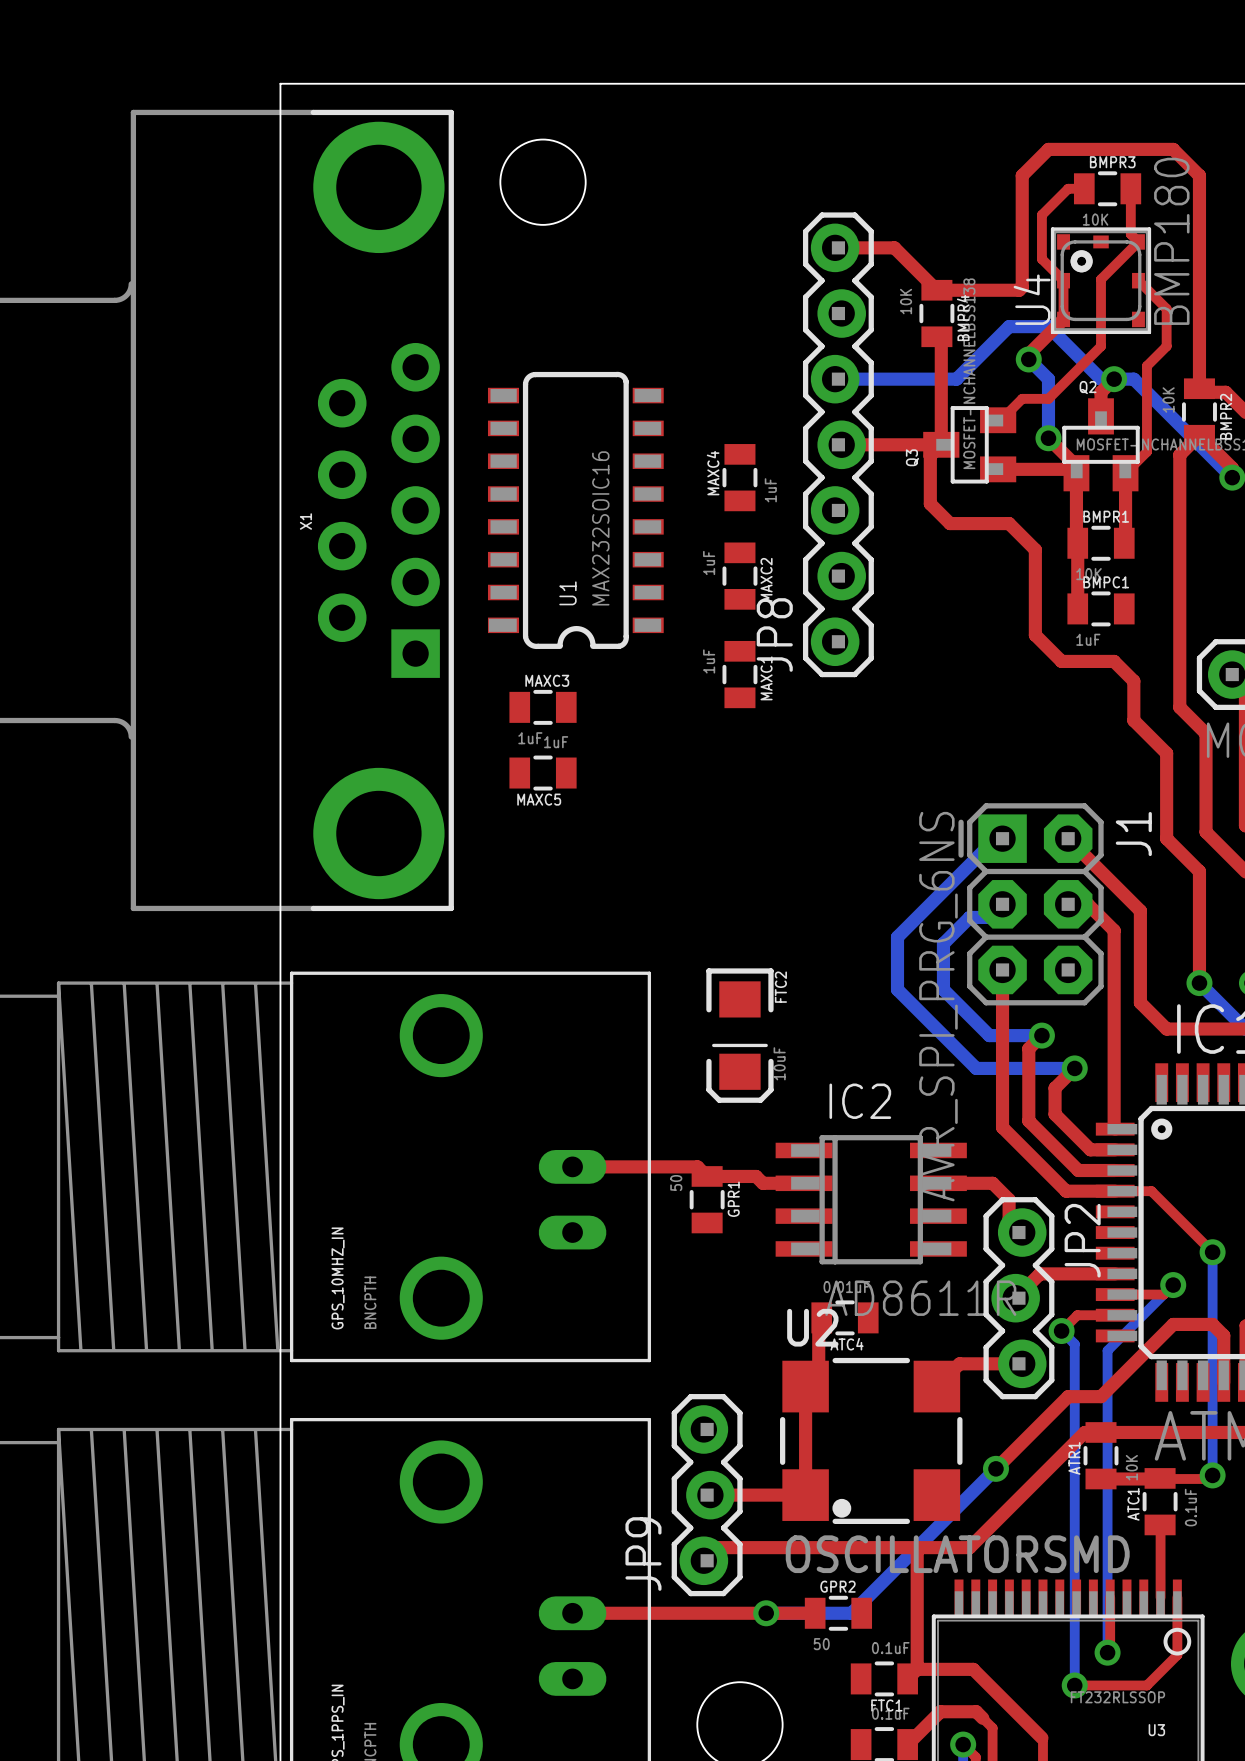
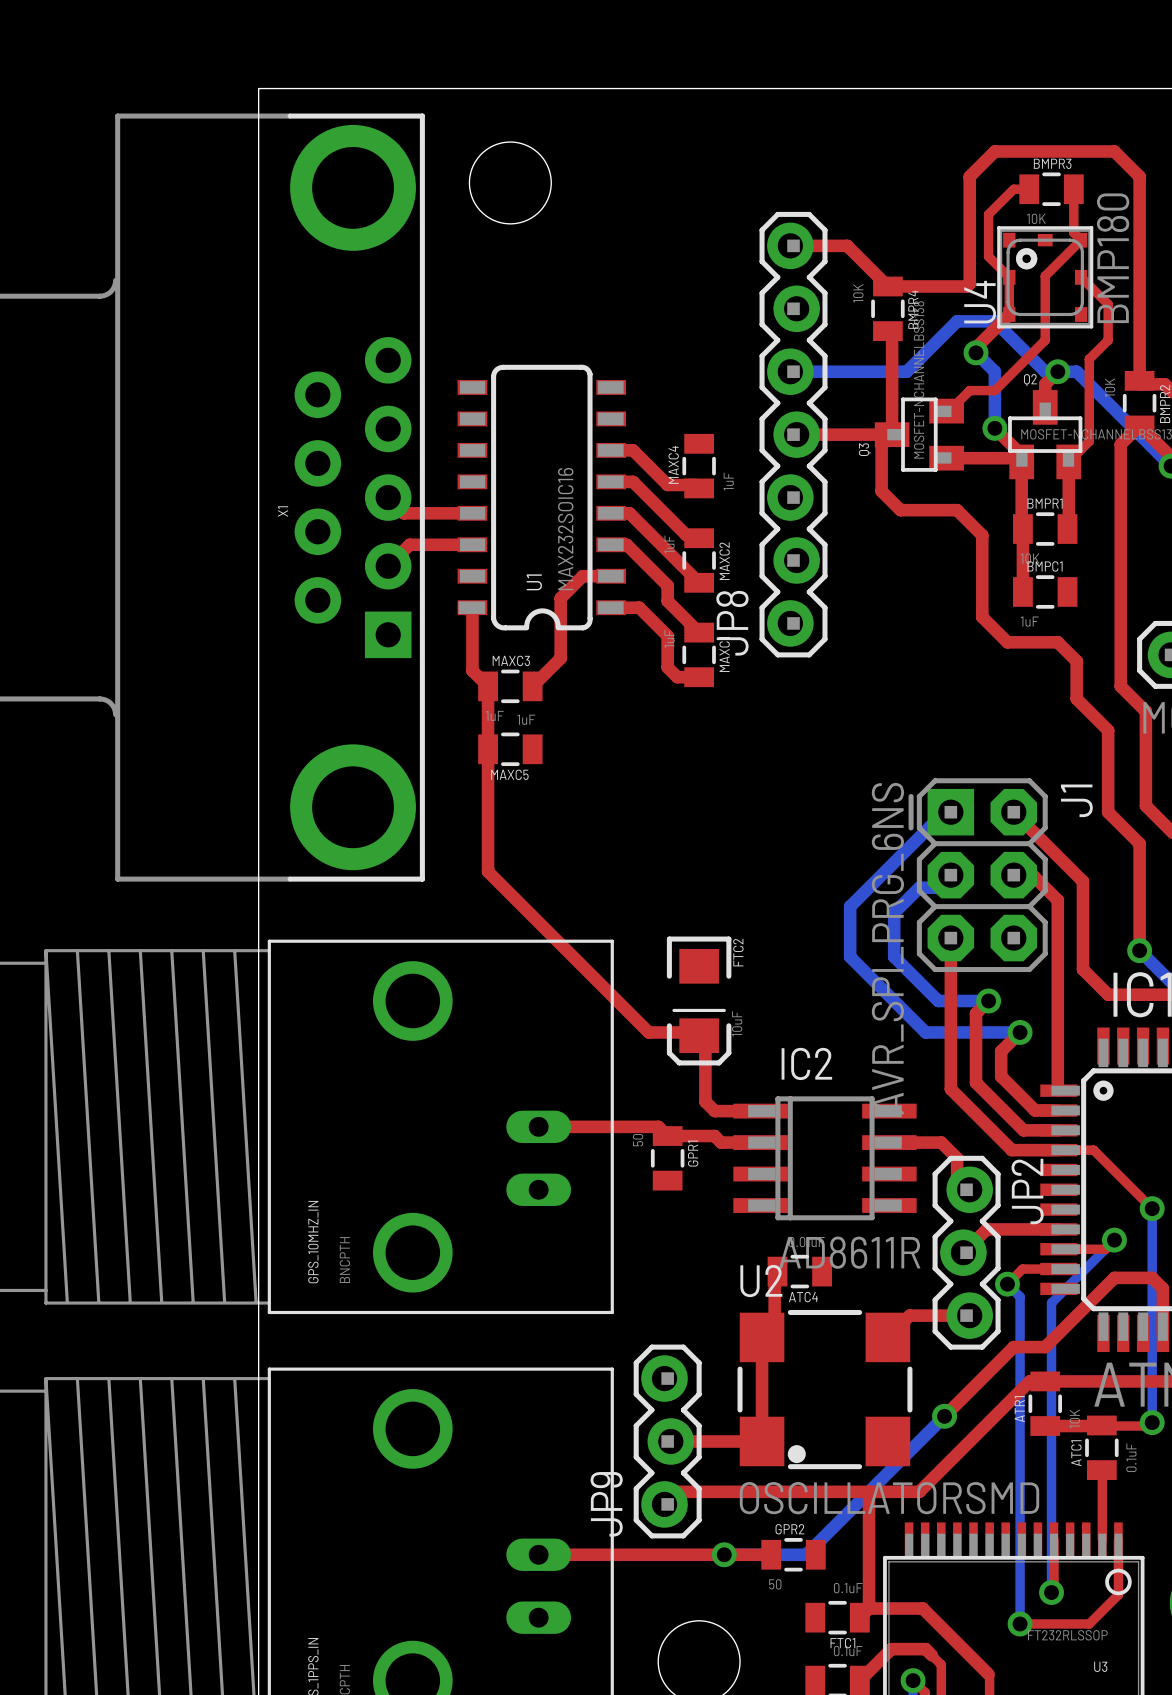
top track: none -> (611, 450) (633, 450) (667, 484) (695, 484) (699, 488)
top track: none -> (611, 481) (633, 481) (686, 535) (696, 535) (699, 538)
top track: none -> (388, 497) (403, 513) (472, 513)
top track: none -> (611, 513) (629, 513) (699, 582)
top track: none -> (472, 544) (409, 544) (388, 566)
top track: none -> (611, 544) (626, 544) (667, 585) (667, 601) (699, 632)
top track: none -> (611, 576) (582, 576) (560, 598) (560, 658) (532, 686)
top track: none -> (472, 607) (472, 670) (488, 686) (488, 871) (648, 1032) (695, 1032) (699, 1035)
top track: none -> (611, 607) (639, 607) (667, 636) (667, 667) (677, 677) (699, 677)
top track: none -> (699, 1038) (699, 1032) (705, 1038) (705, 1101) (714, 1111) (760, 1111)

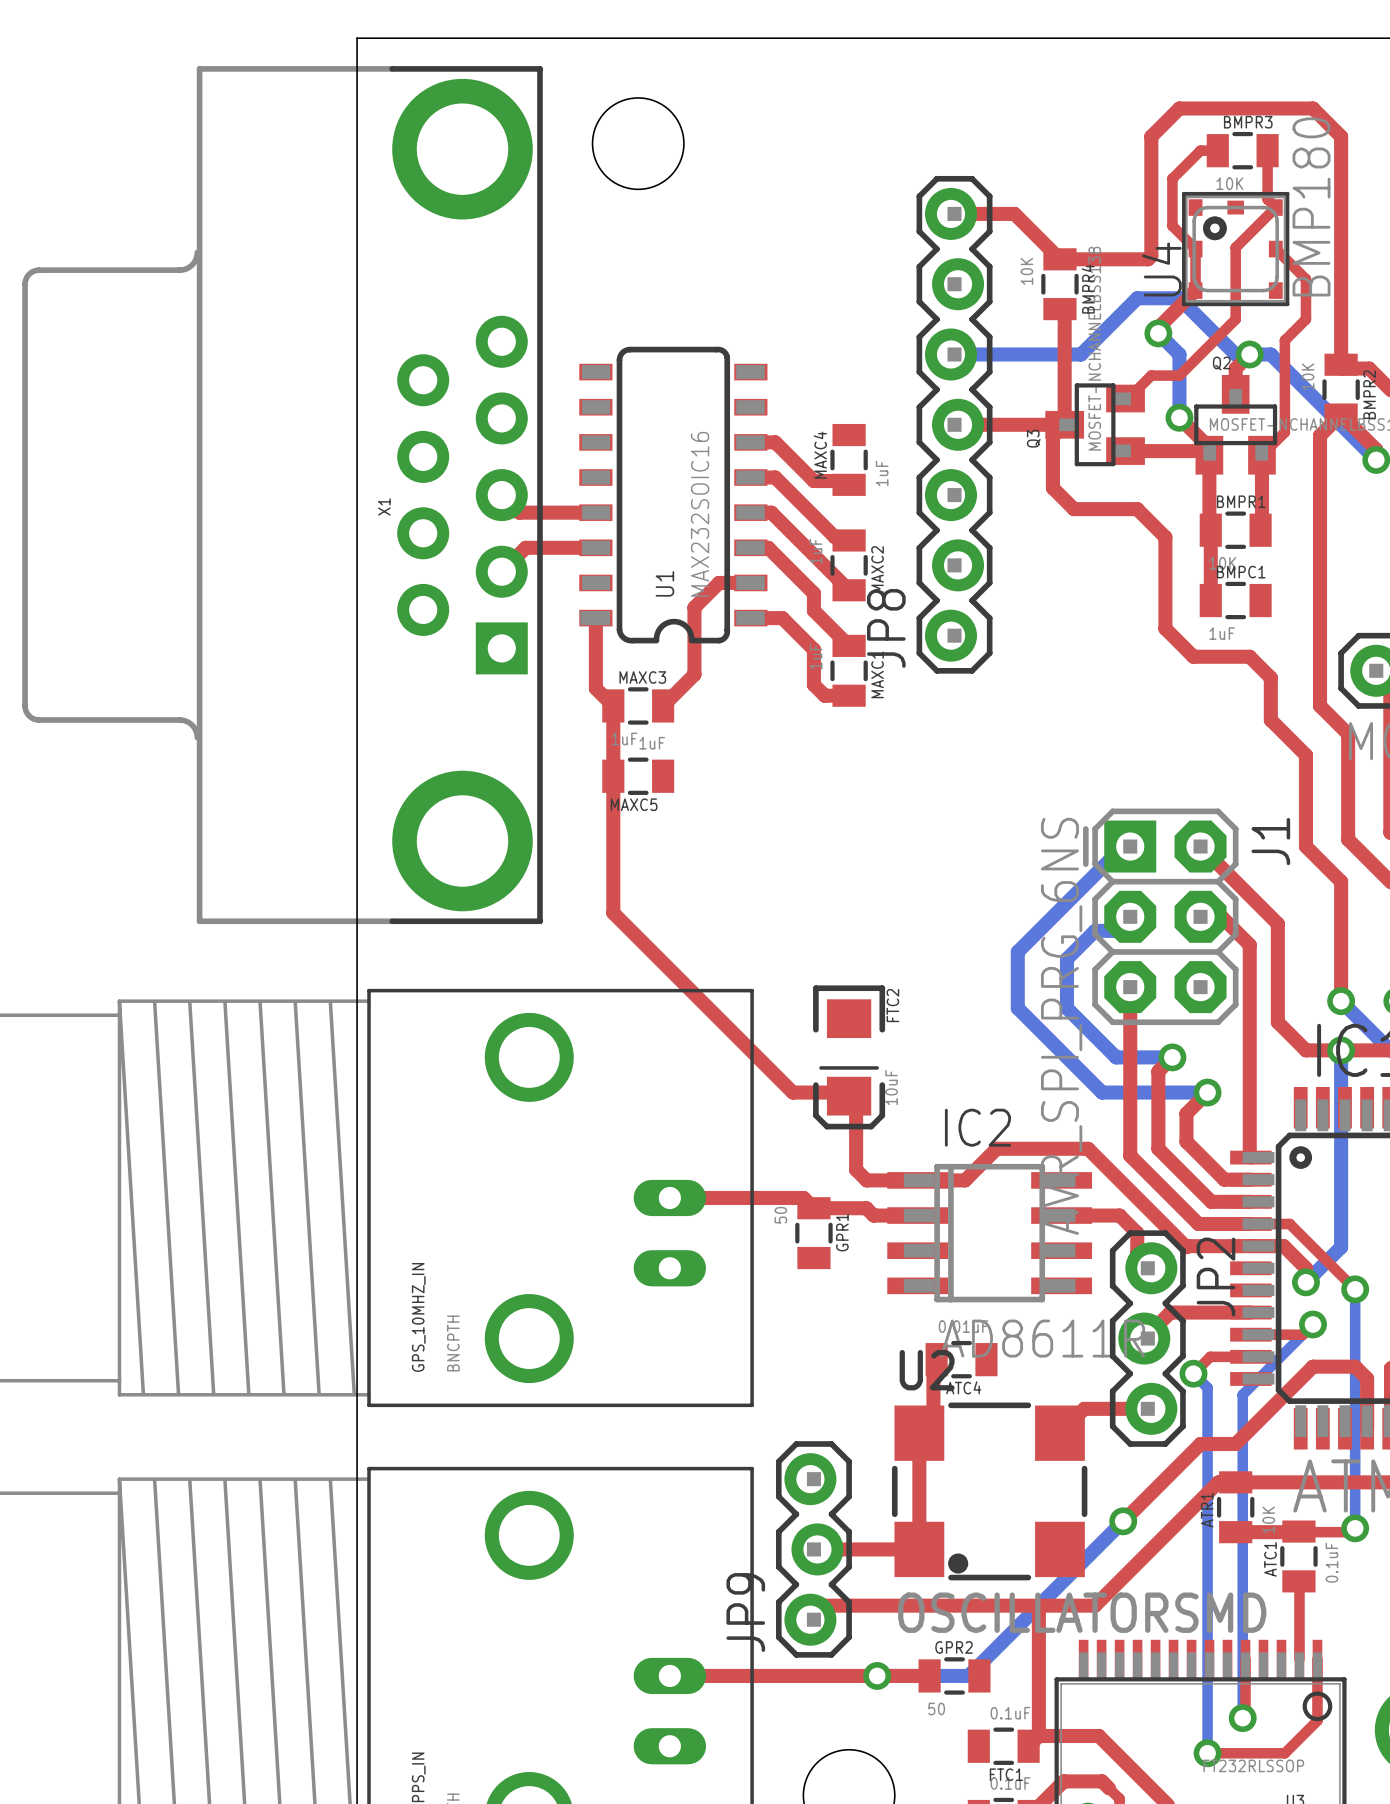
bottom track: none -> (1341, 1050) (1341, 1247) (1305, 1282)
via: none -> (1341, 1050)
top track: none -> (917, 1180) (965, 1180) (996, 1148) (1088, 1148) (1186, 1247) (1283, 1246) (1305, 1268) (1305, 1282)
via: none -> (1305, 1282)

